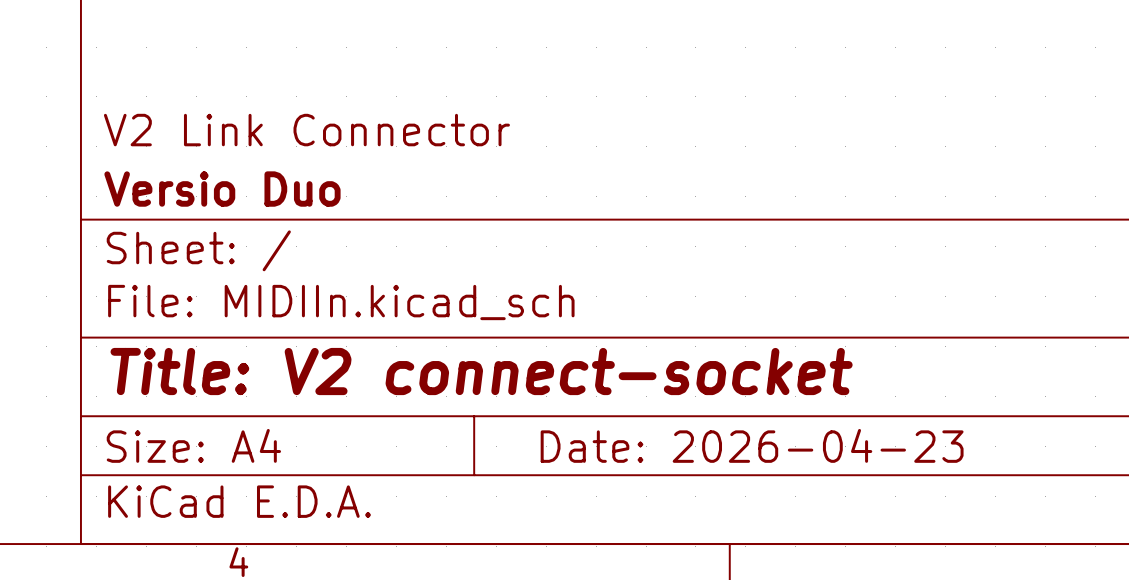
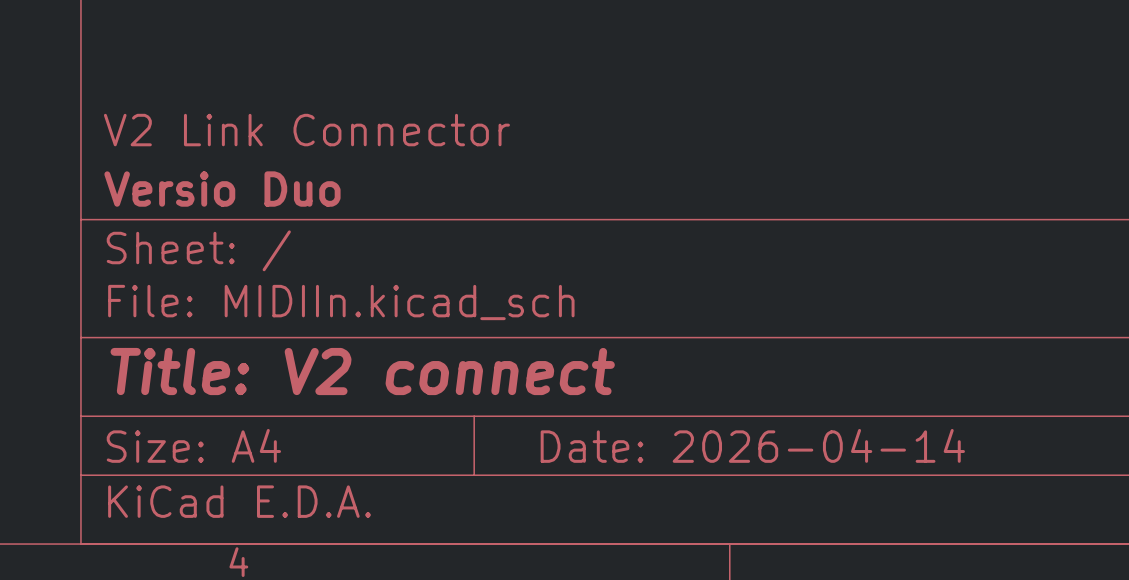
title block: Title: V2 connect-socket (481, 371) -> Title: V2 connect (362, 371)
title block: Date: 2026-04-23 (752, 445) -> Date: 2026-04-14 (752, 445)

